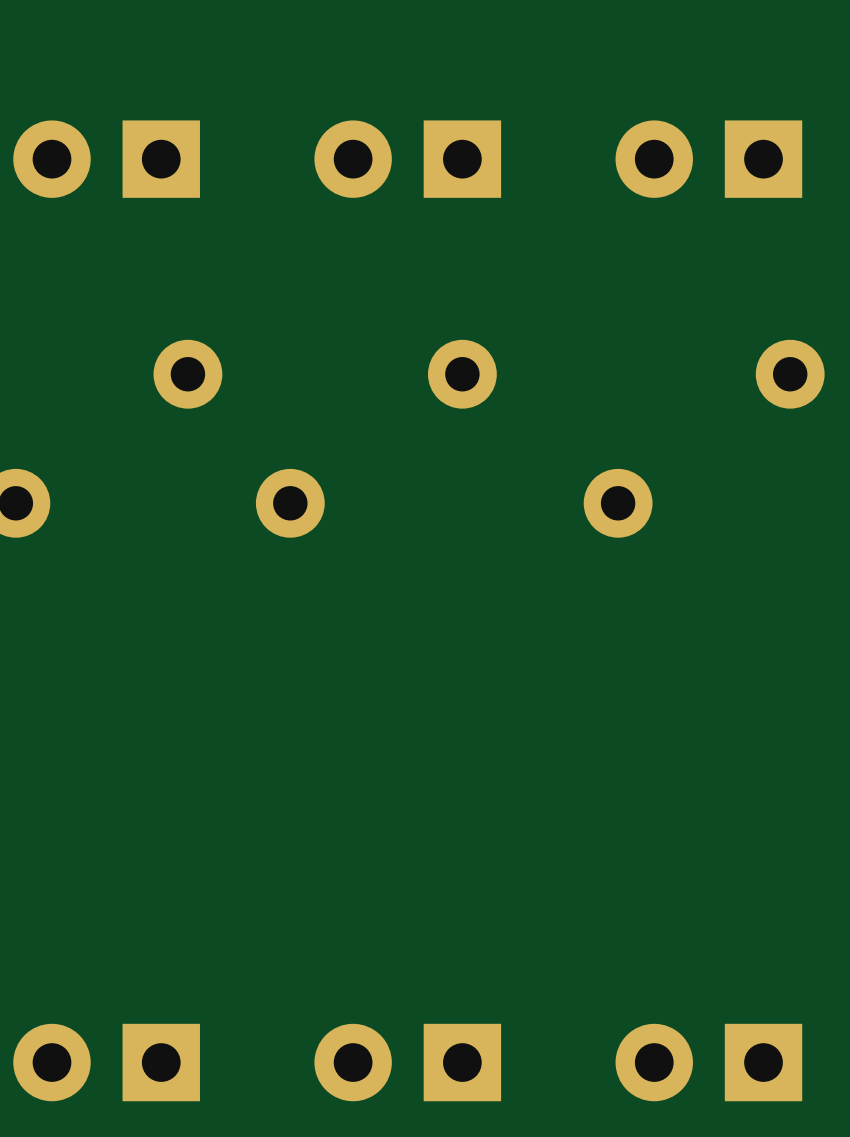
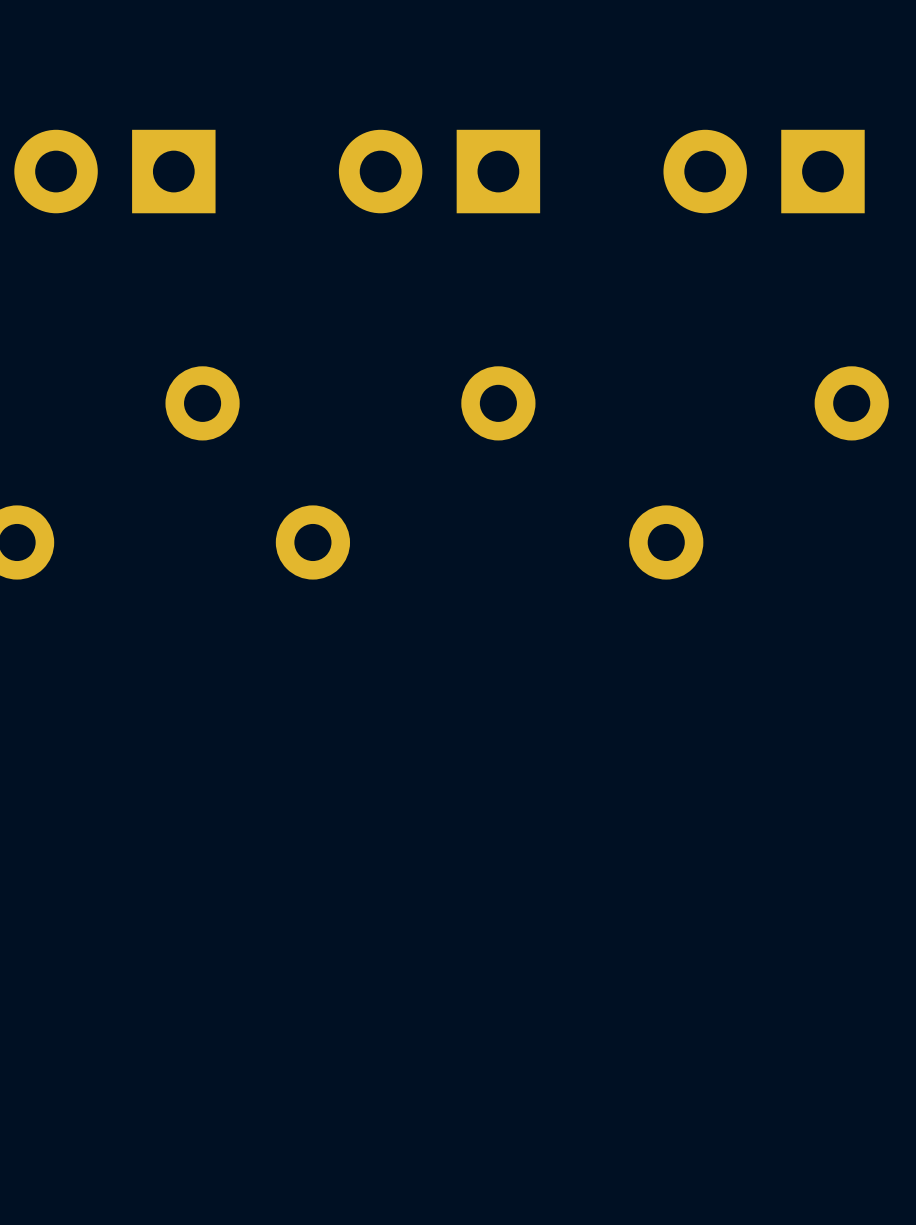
part: (106, 1062) -> none
part: (407, 1062) -> none
part: (708, 1062) -> none

